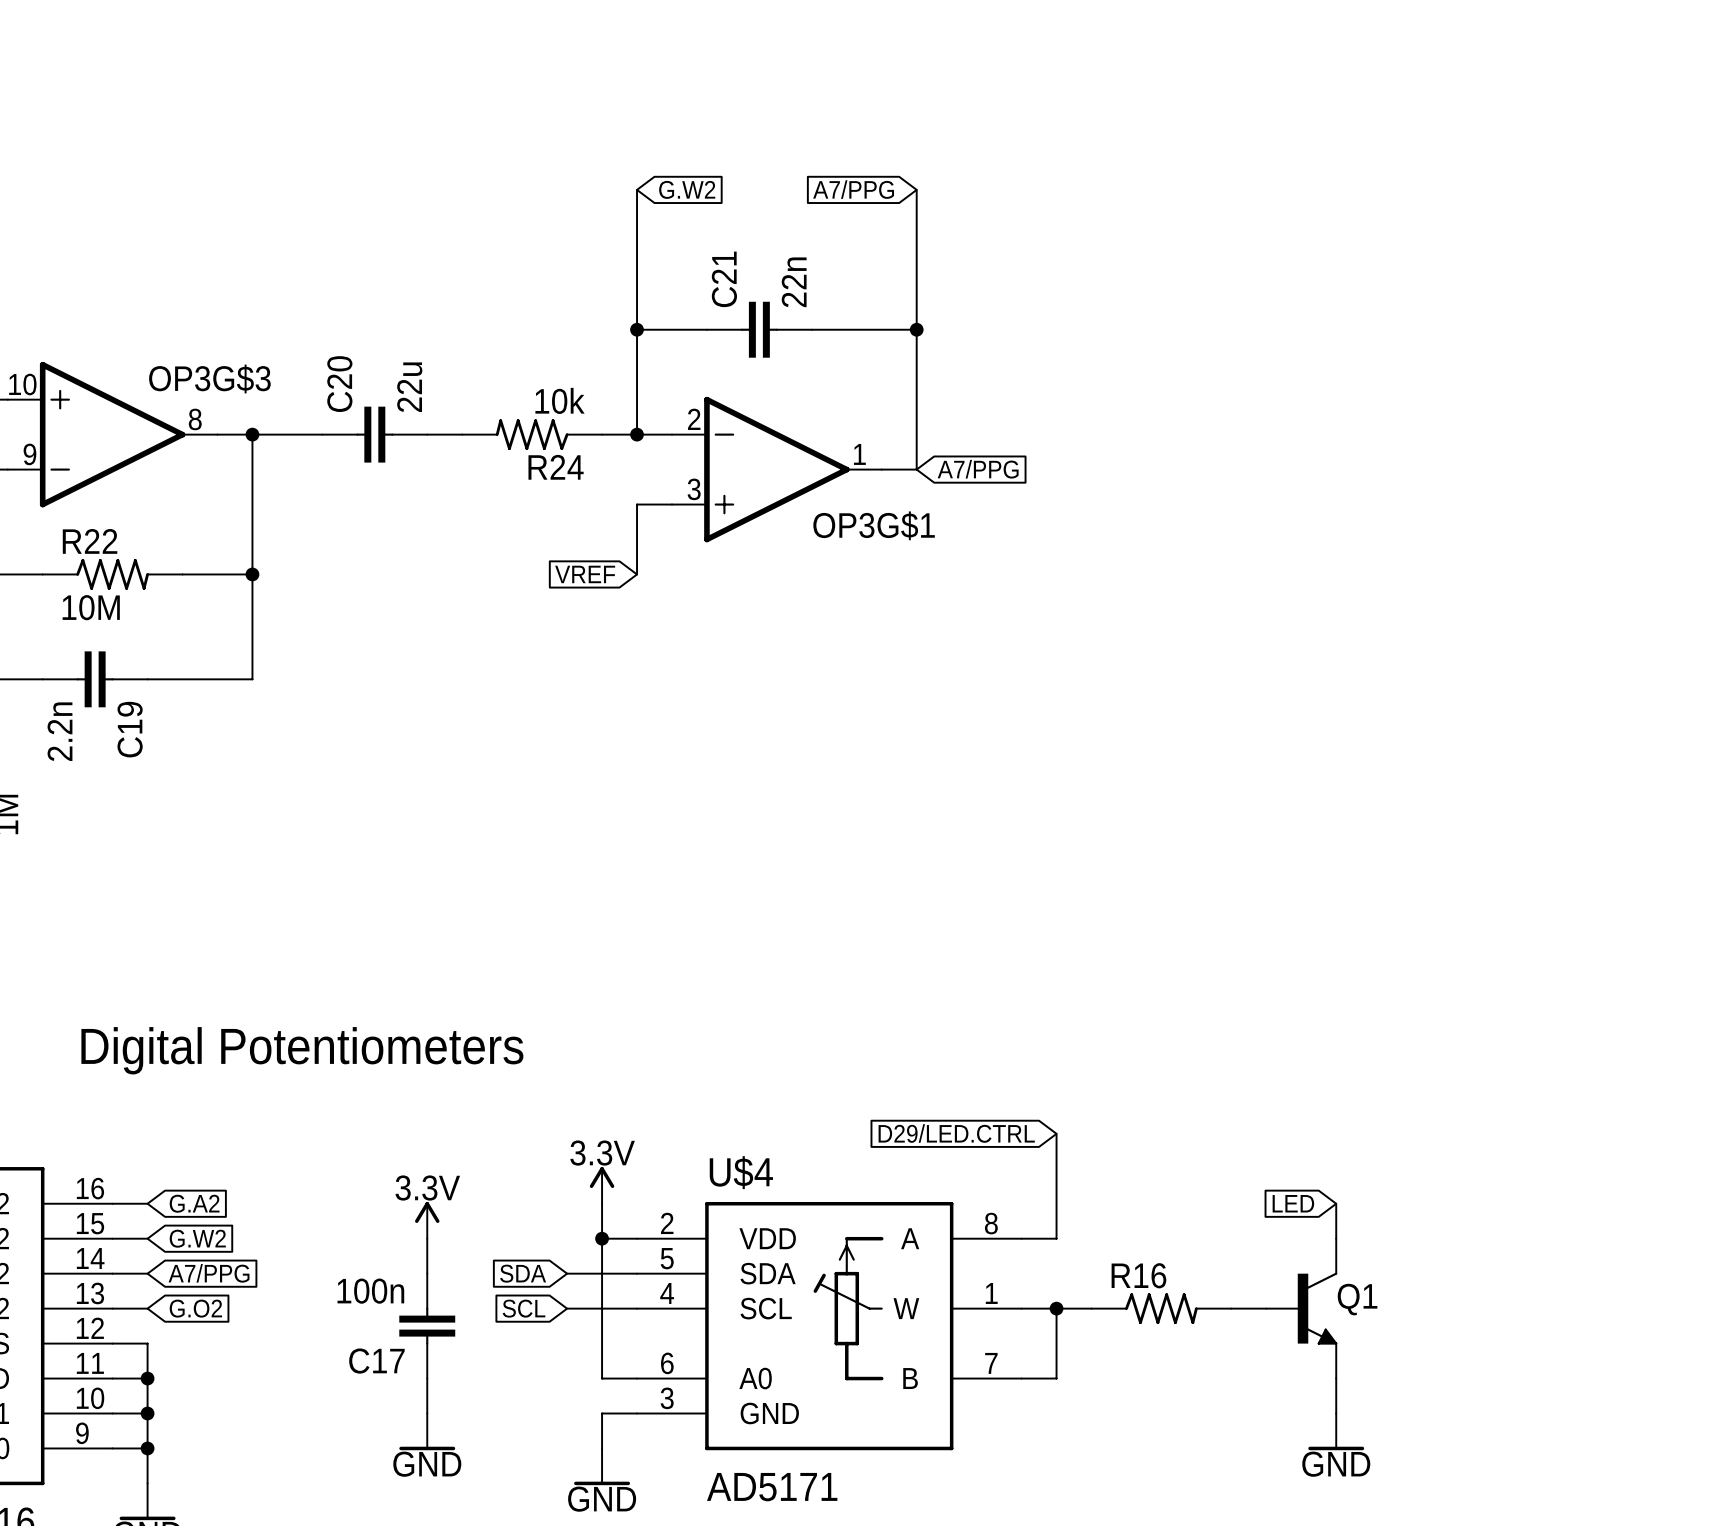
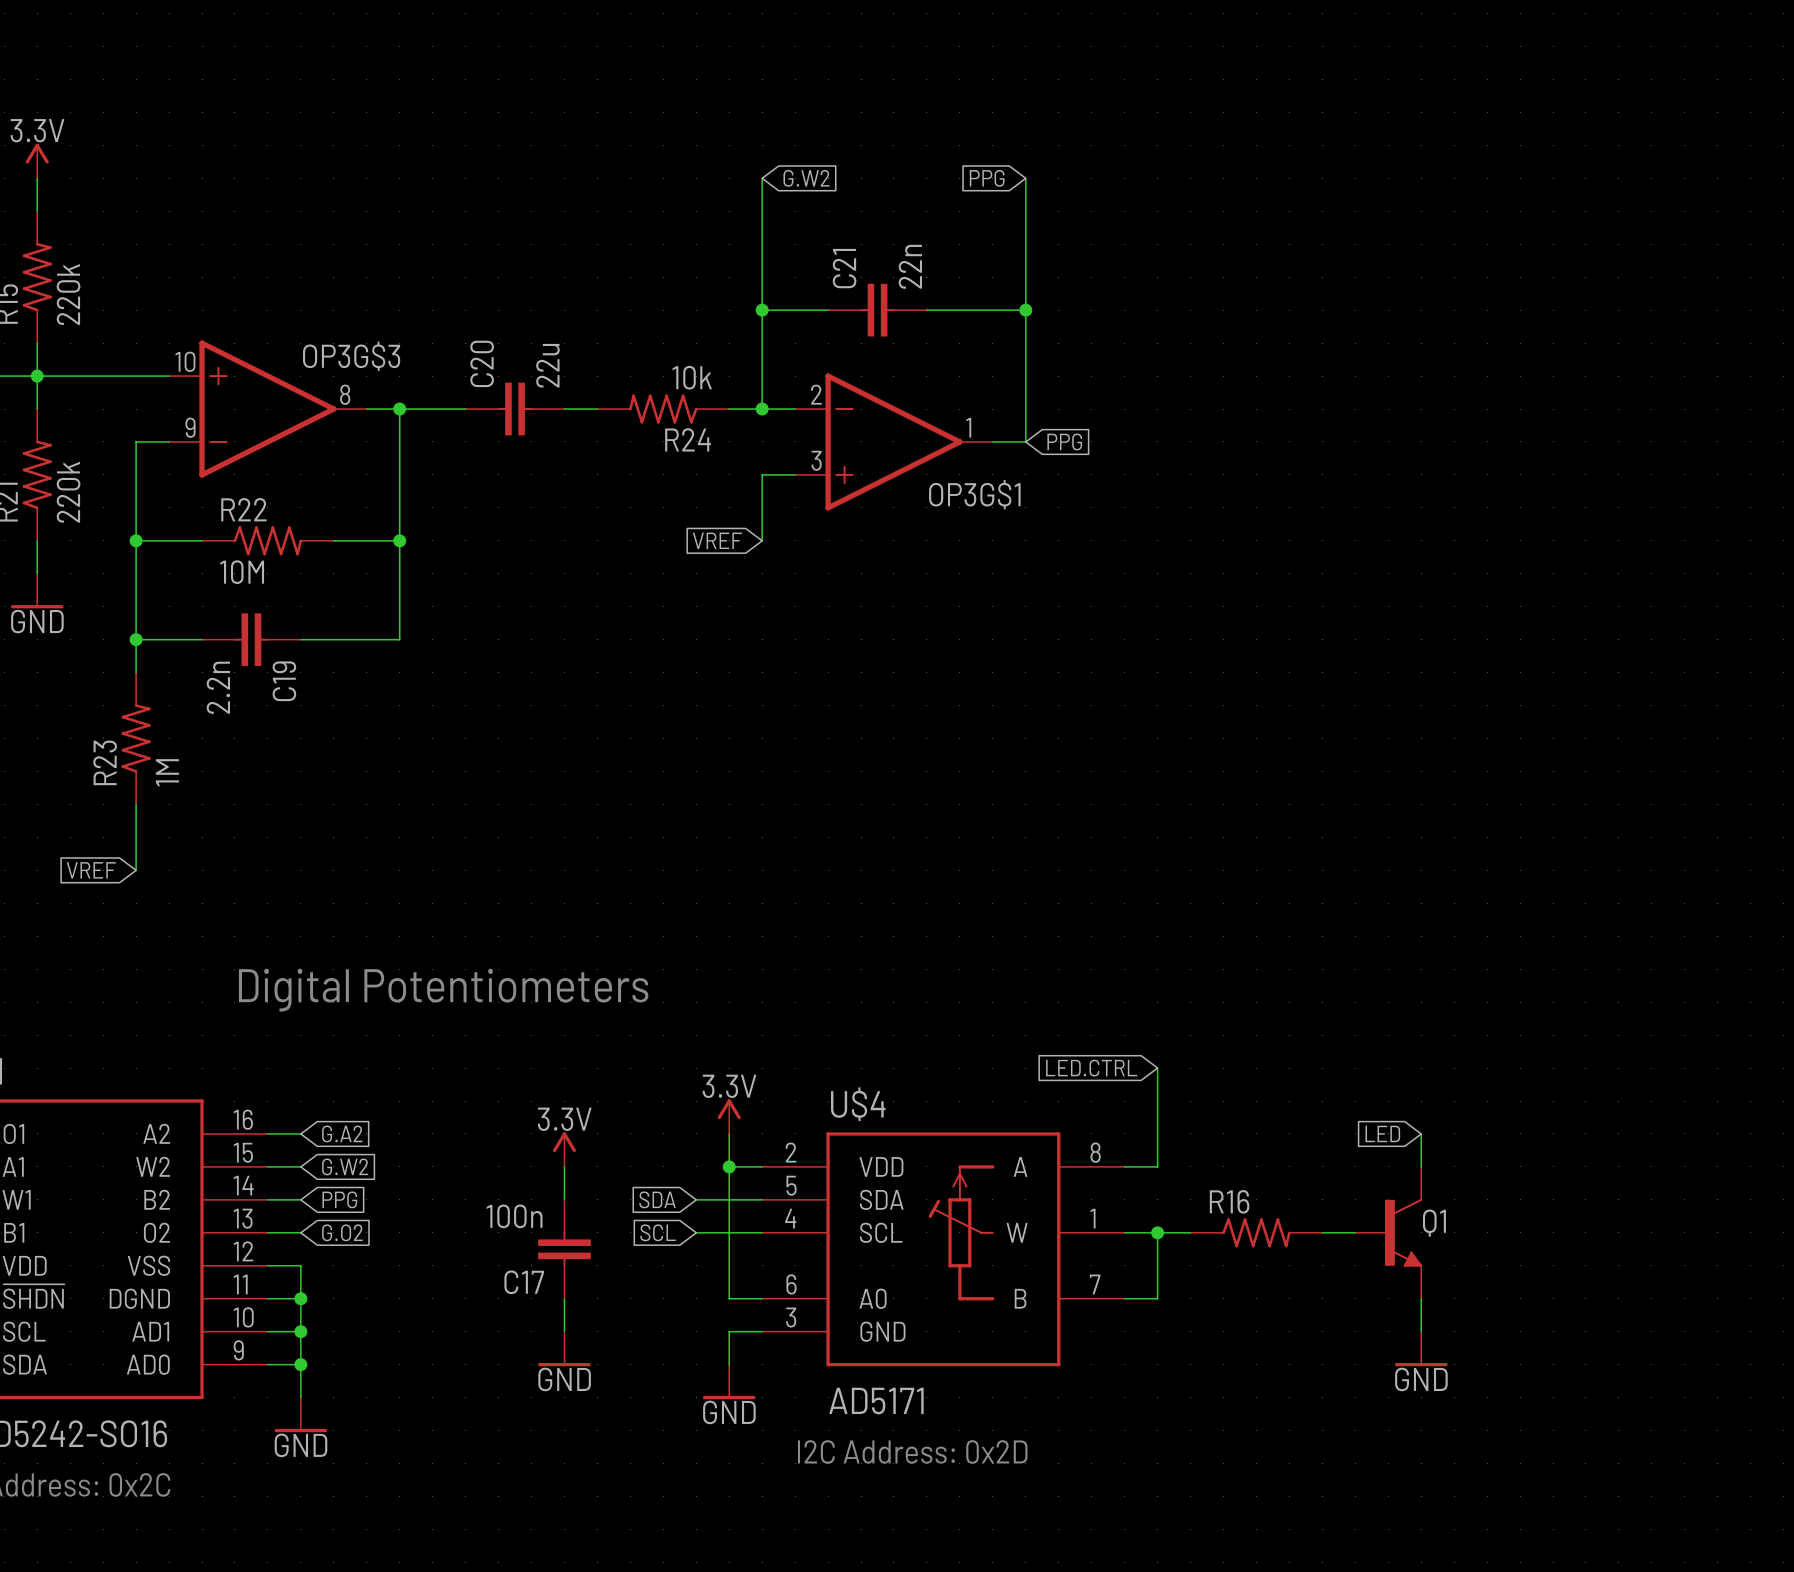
global label: A7/PPG (853, 189) -> PPG (987, 178)
global label: A7/PPG (978, 469) -> PPG (1064, 441)
global label: D29/LED.CTRL (956, 1133) -> LED.CTRL (1091, 1068)
global label: A7/PPG (209, 1273) -> PPG (339, 1199)

